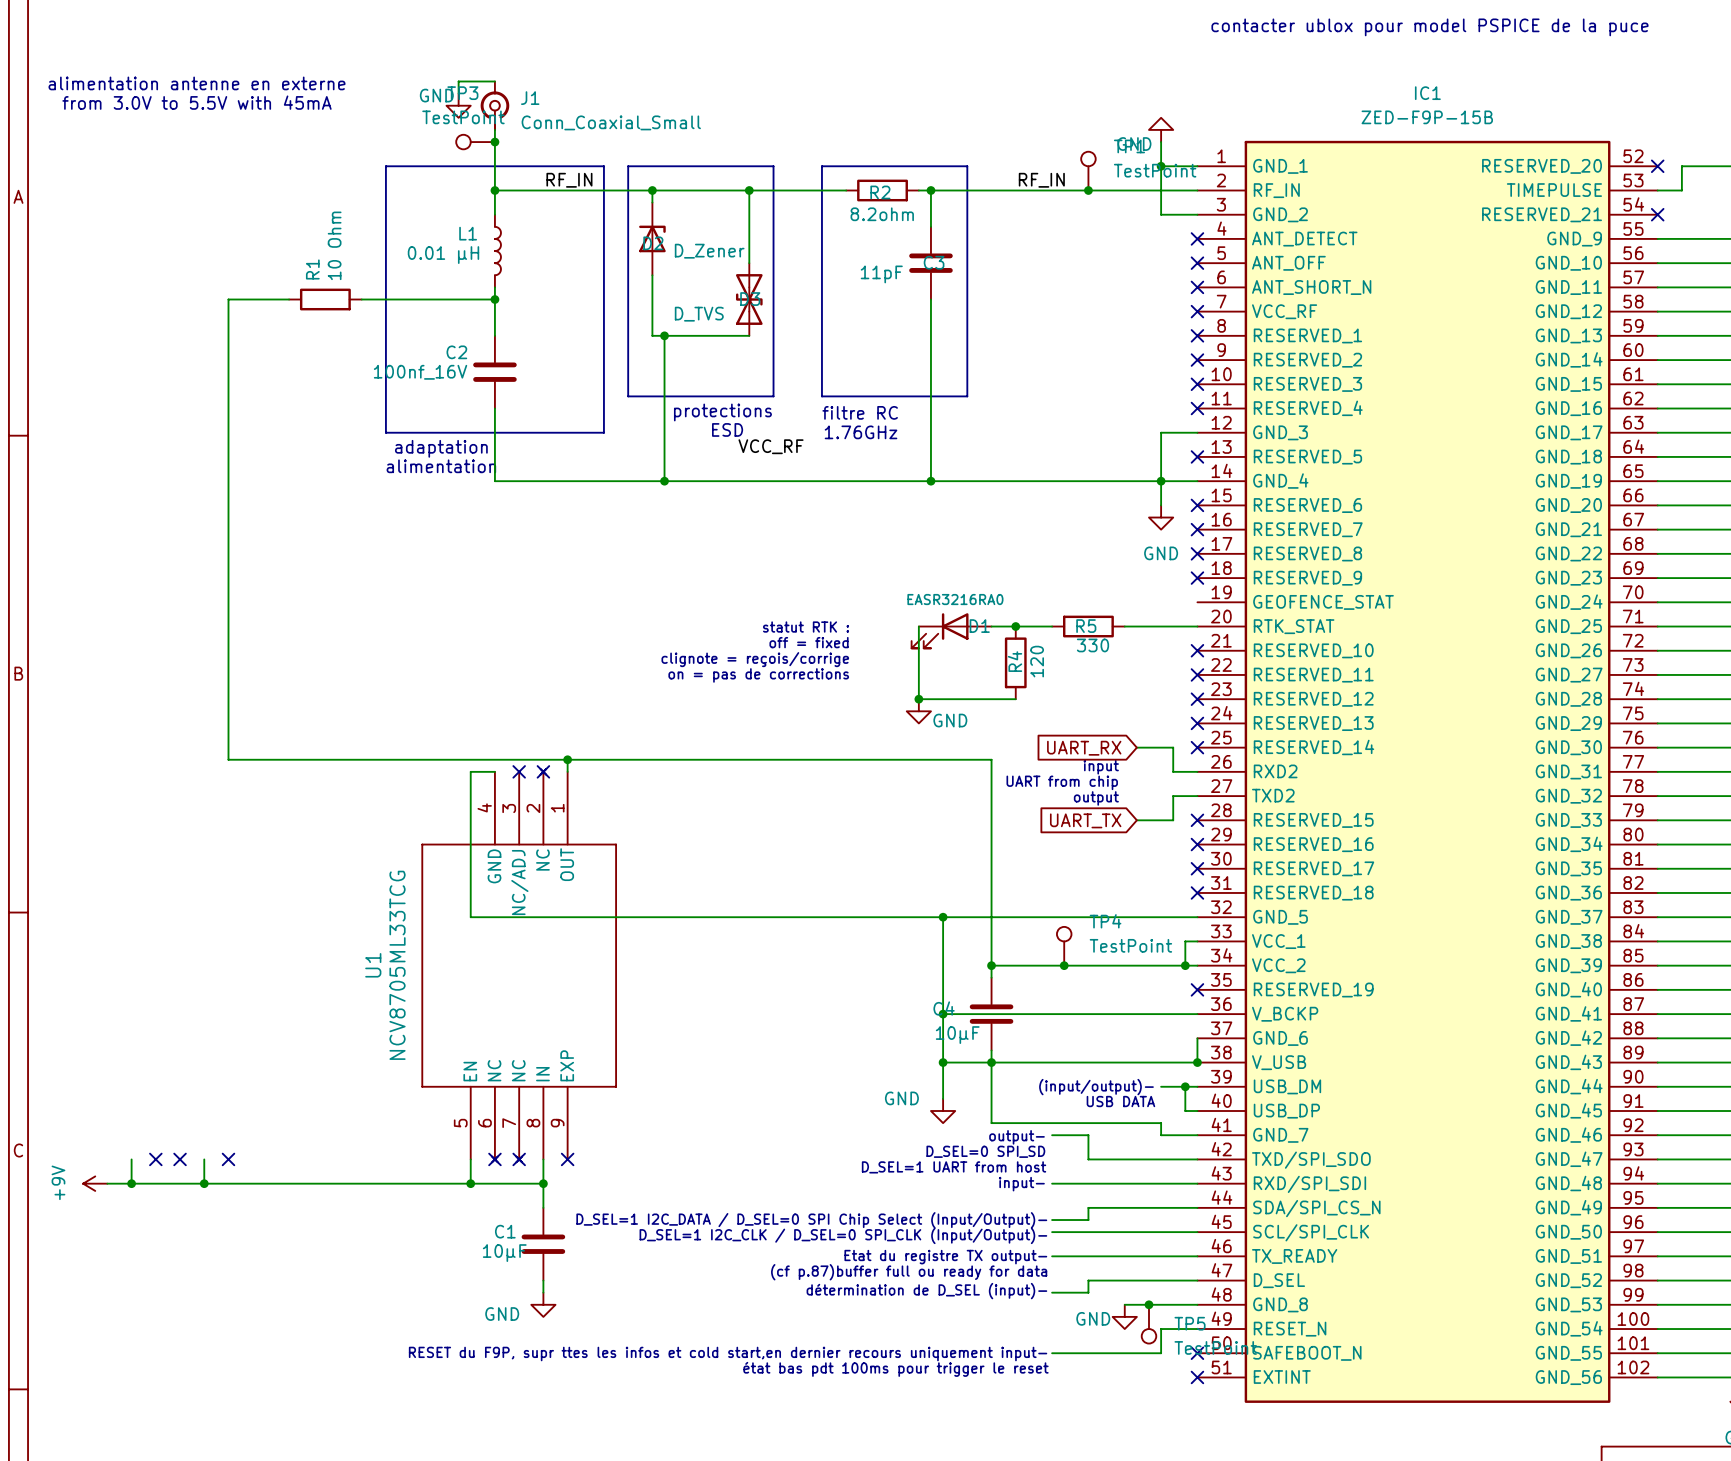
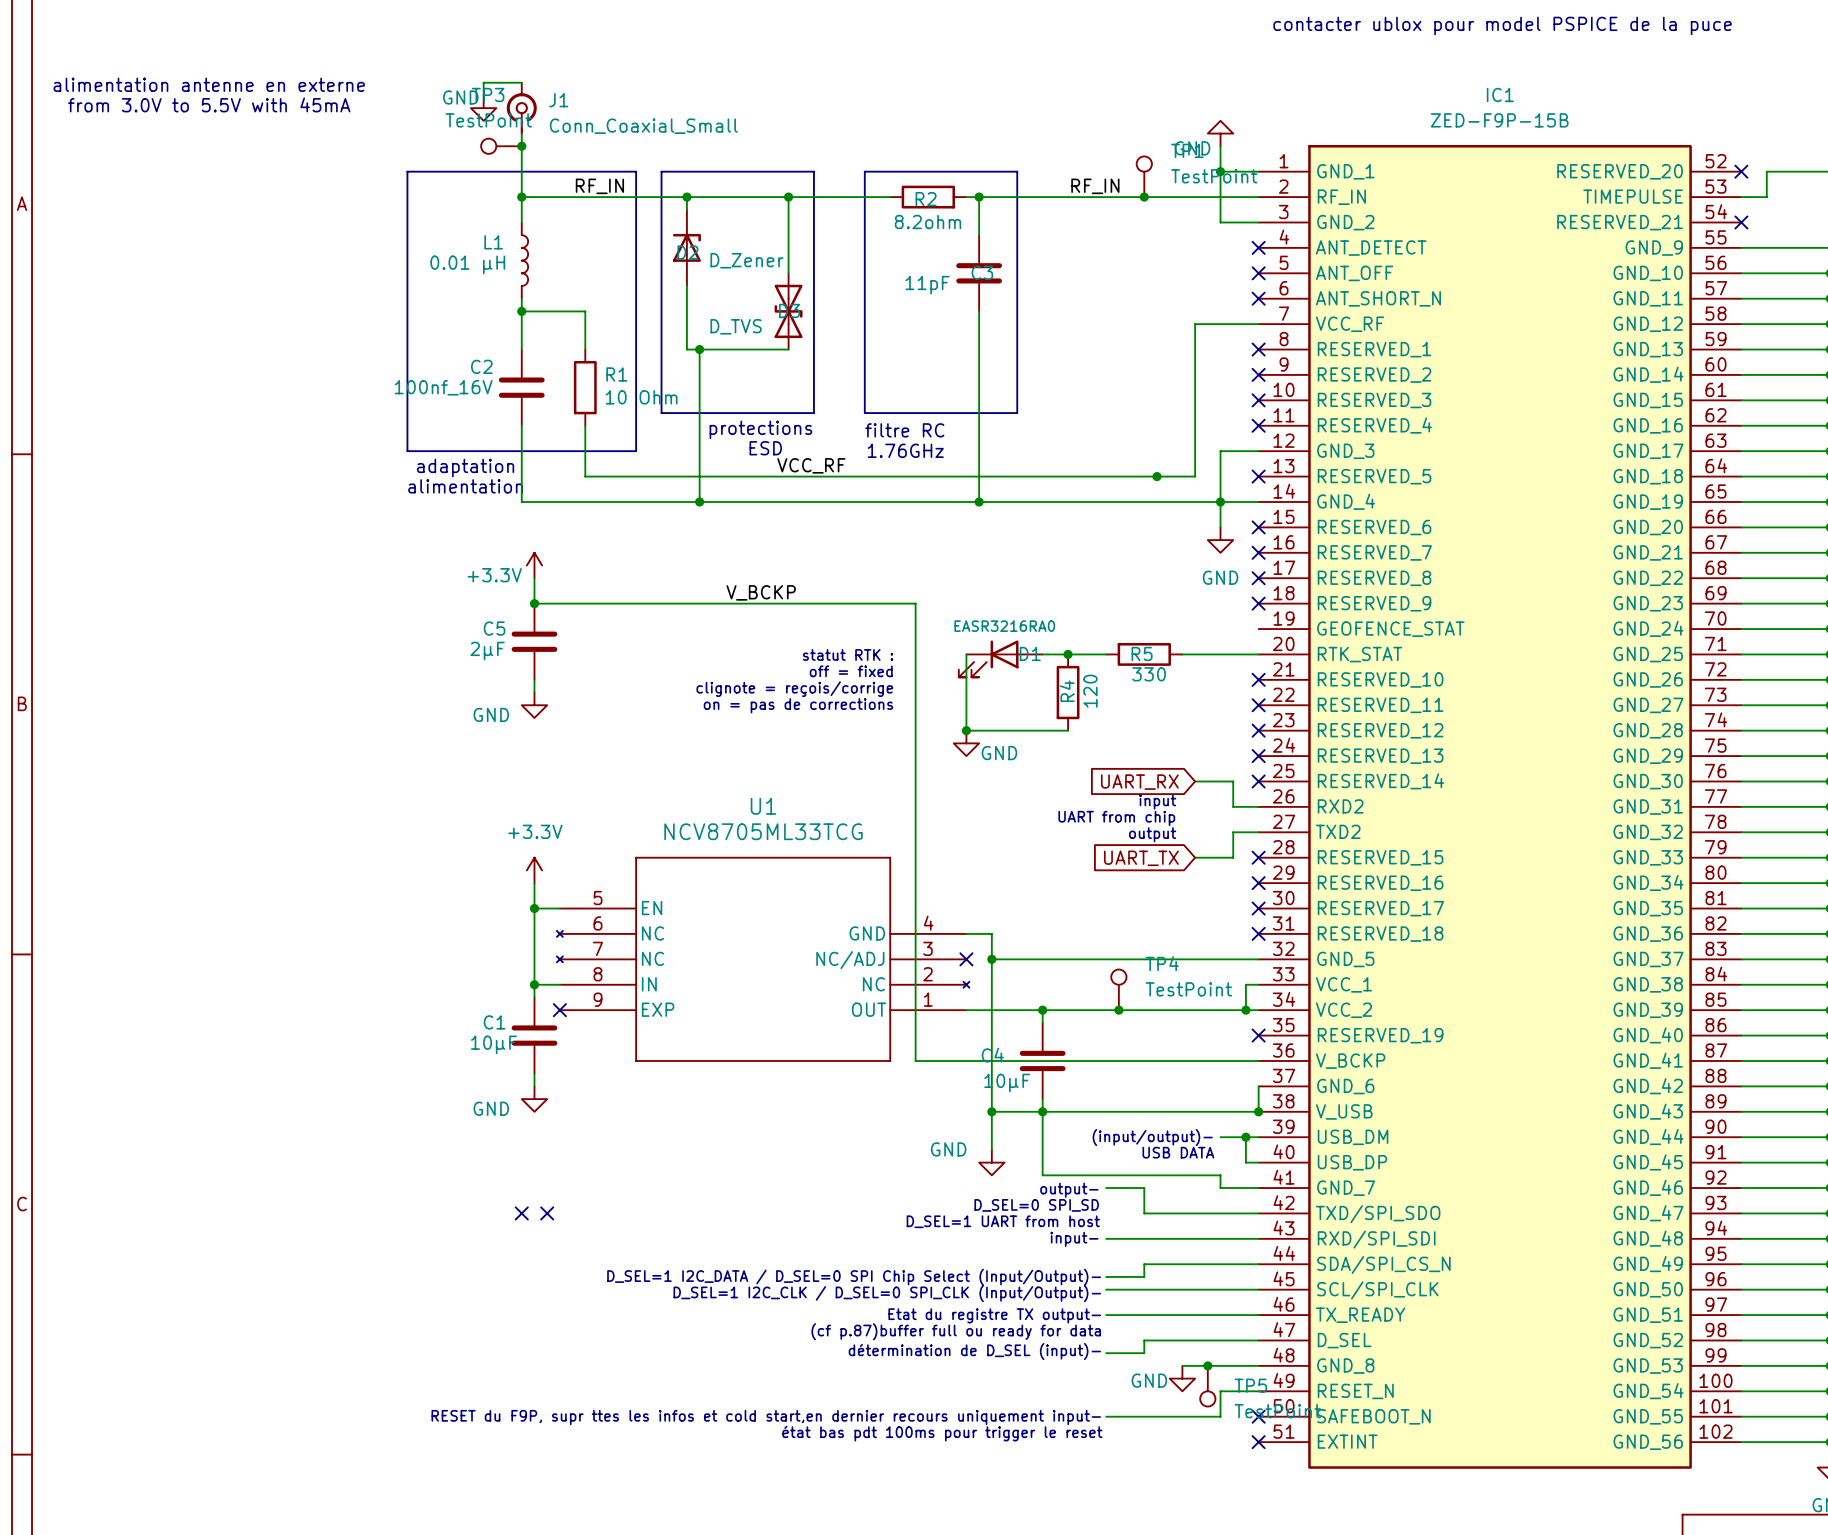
wire: (289, 299) (228, 299) (228, 759) (991, 759) (991, 965) -> (966, 1010) (1042, 1010)
R1 rotation: 0° (325, 299) -> 90° clockwise (585, 387)
R1 position: (325, 299) -> (585, 387)
wire: (361, 299) (494, 299) -> (585, 349) (585, 311) (521, 311)
wire: none -> (1258, 324) (1195, 324) (1195, 476) (585, 476) (585, 425)
no-connect mark: (1197, 311) -> none
junction: none -> (1157, 476)
power symbol: none -> +3.3V (534, 565)
wire: none -> (534, 578) (534, 603) (915, 603) (915, 1060) (991, 1060)
label: none -> V_BCKP (761, 592)
junction: none -> (534, 603)
C5: none -> 2µF (534, 641)
power symbol: none -> GND (534, 705)
wire: (567, 759) (567, 771) -> (534, 679) (534, 692)
junction: (567, 759) -> none
wire: (494, 771) (470, 771) (470, 917) (943, 917) -> (966, 933) (991, 933) (991, 959)
no-connect mark: (519, 771) -> none
no-connect mark: (543, 771) -> none
power symbol: none -> +3.3V (534, 870)
wire: none -> (534, 883) (534, 997)
wire: none -> (534, 908) (559, 908)
junction: none -> (534, 908)
no-connect mark: none -> (966, 959)
wire: none -> (534, 984) (559, 984)
junction: none -> (534, 984)
U1 rotation: 0° (519, 965) -> 90° clockwise (763, 959)
no-connect mark: none -> (559, 1010)
junction: (943, 1014) -> none
wire: none -> (534, 1073) (534, 1086)
power symbol: none -> GND (534, 1099)
wire: (131, 1159) (131, 1183) -> none
no-connect mark: (155, 1159) -> none
no-connect mark: (180, 1159) -> none
wire: (204, 1159) (204, 1183) -> none
no-connect mark: (228, 1159) -> none
wire: (470, 1159) (470, 1183) -> none
wire: (543, 1159) (543, 1207) -> none
no-connect mark: (567, 1159) -> none
power symbol: +9V (95, 1183) -> none
wire: (107, 1183) (543, 1183) -> none
junction: (131, 1183) -> none
junction: (204, 1183) -> none
junction: (470, 1183) -> none
junction: (543, 1183) -> none
C1 position: (543, 1244) -> (534, 1035)
wire: (543, 1280) (543, 1292) -> none
power symbol: GND (543, 1304) -> none

